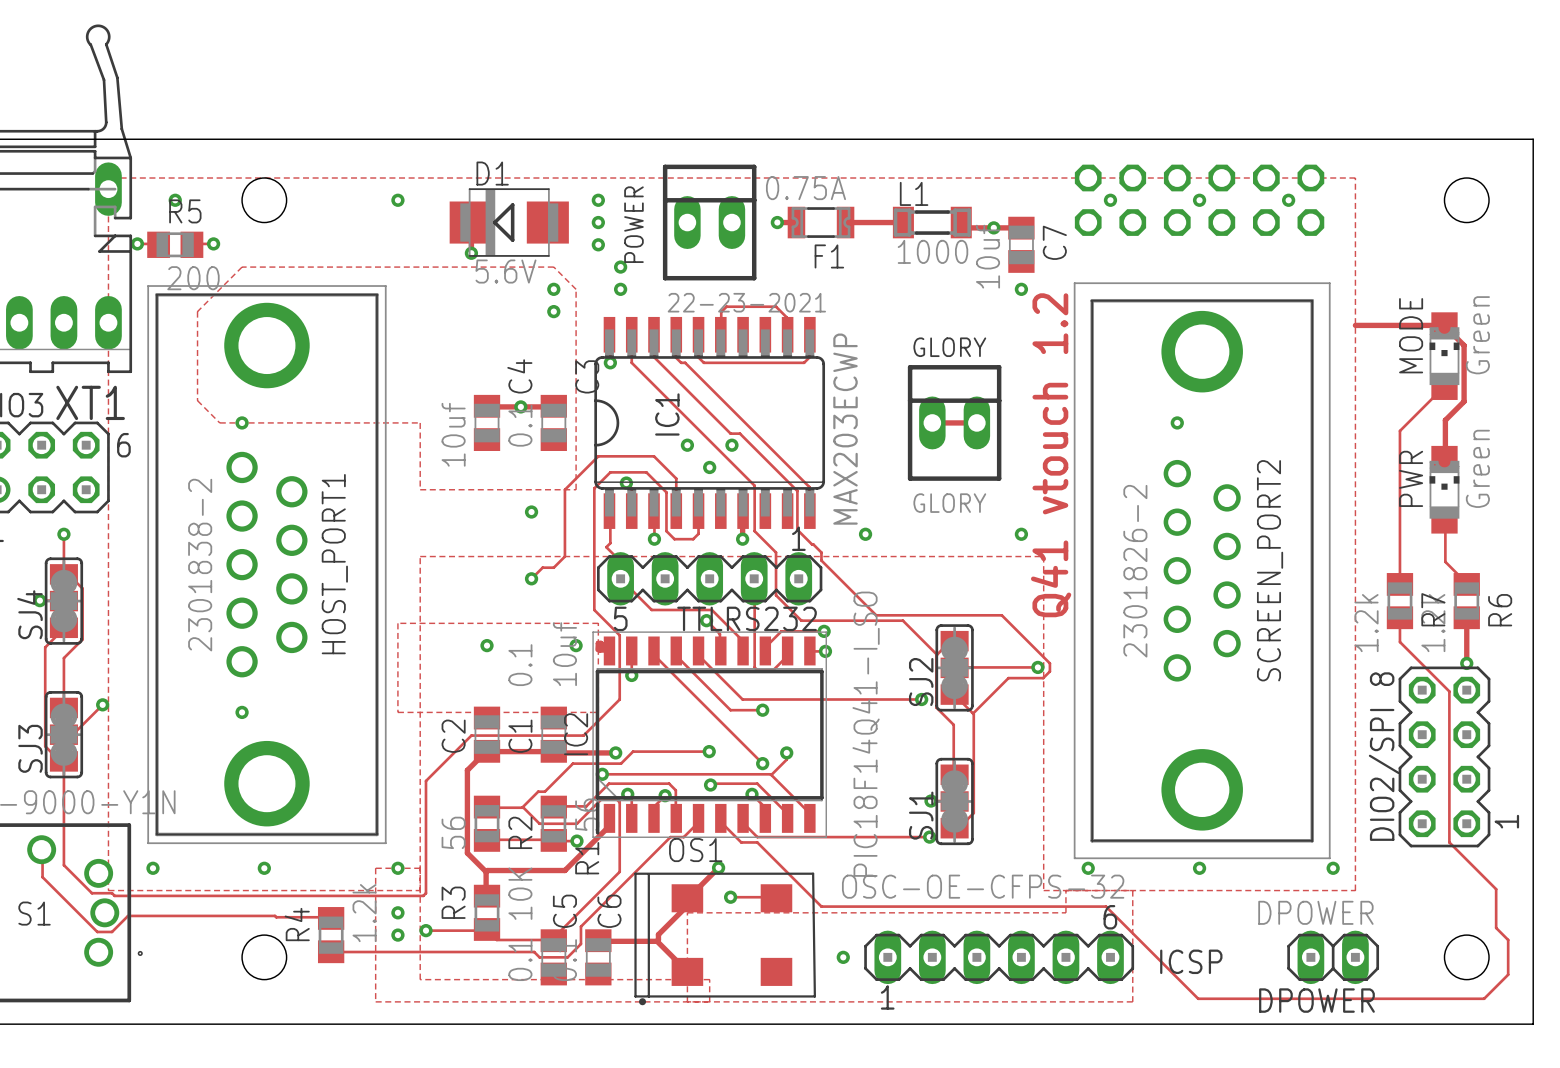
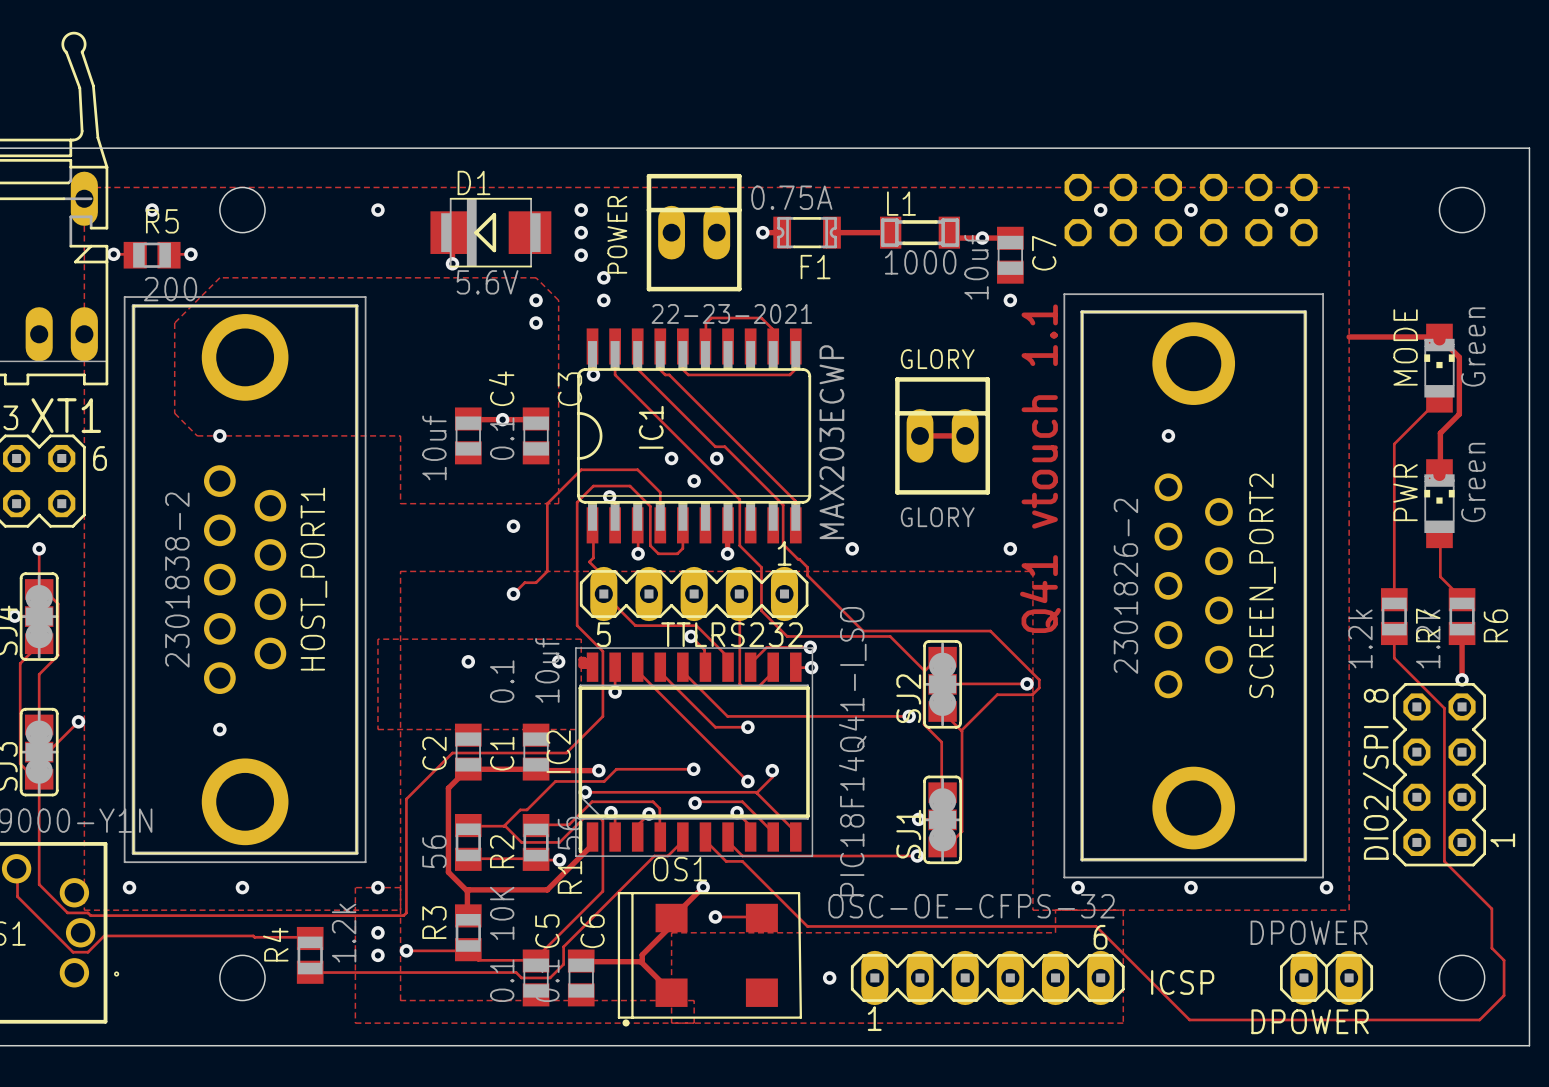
text: Q41 vtouch 1.2 (1051, 455) -> Q41 vtouch 1.1 (1040, 468)

